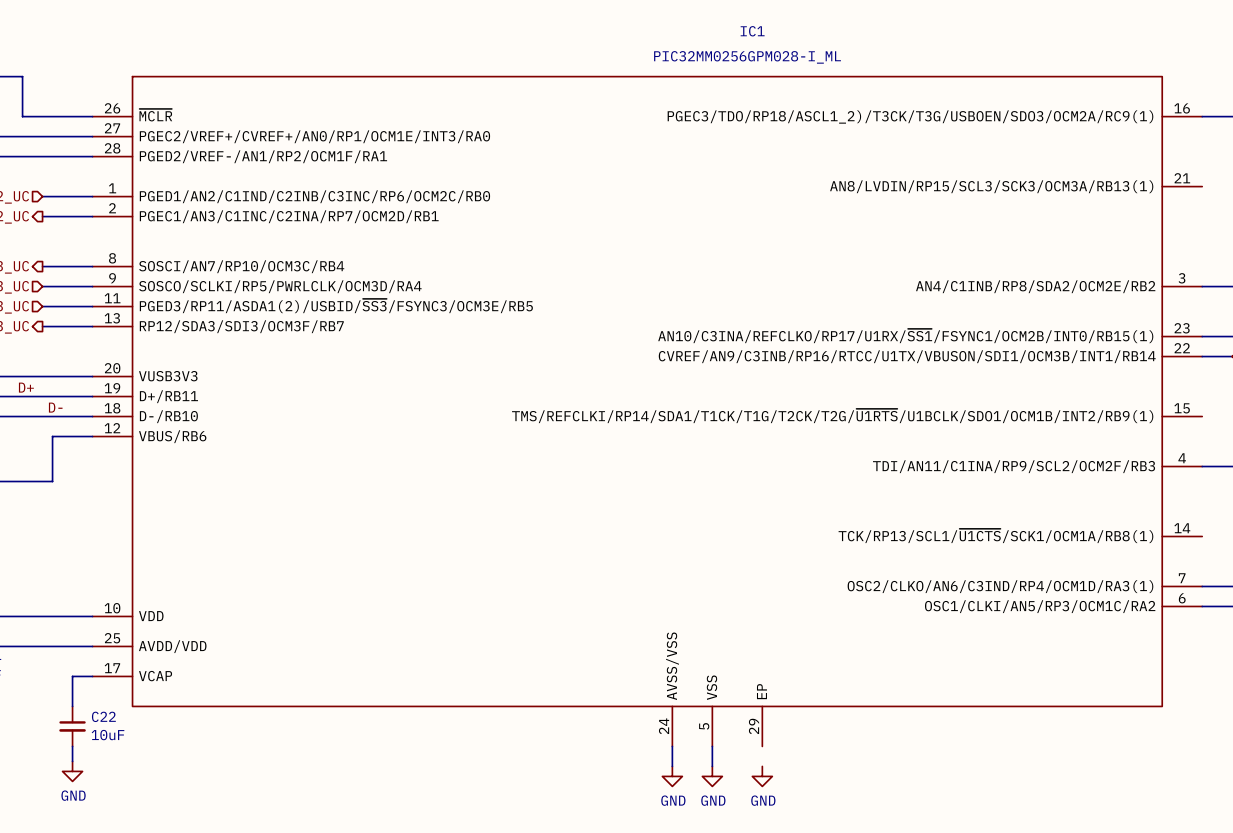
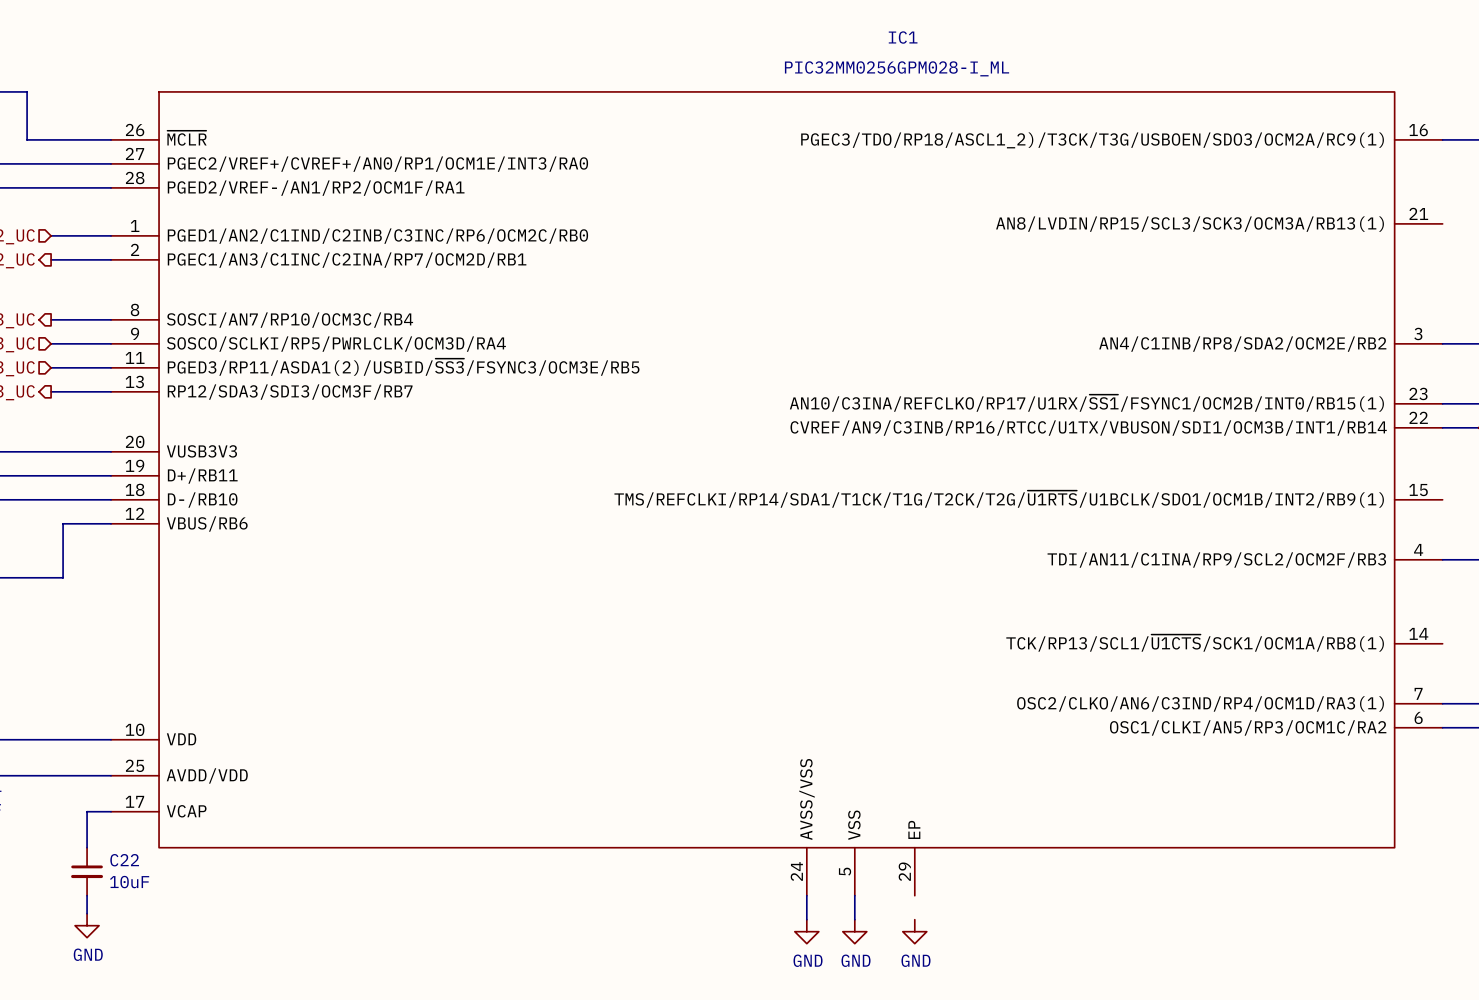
label: D+ (26, 387) -> none
label: D- (55, 407) -> none

